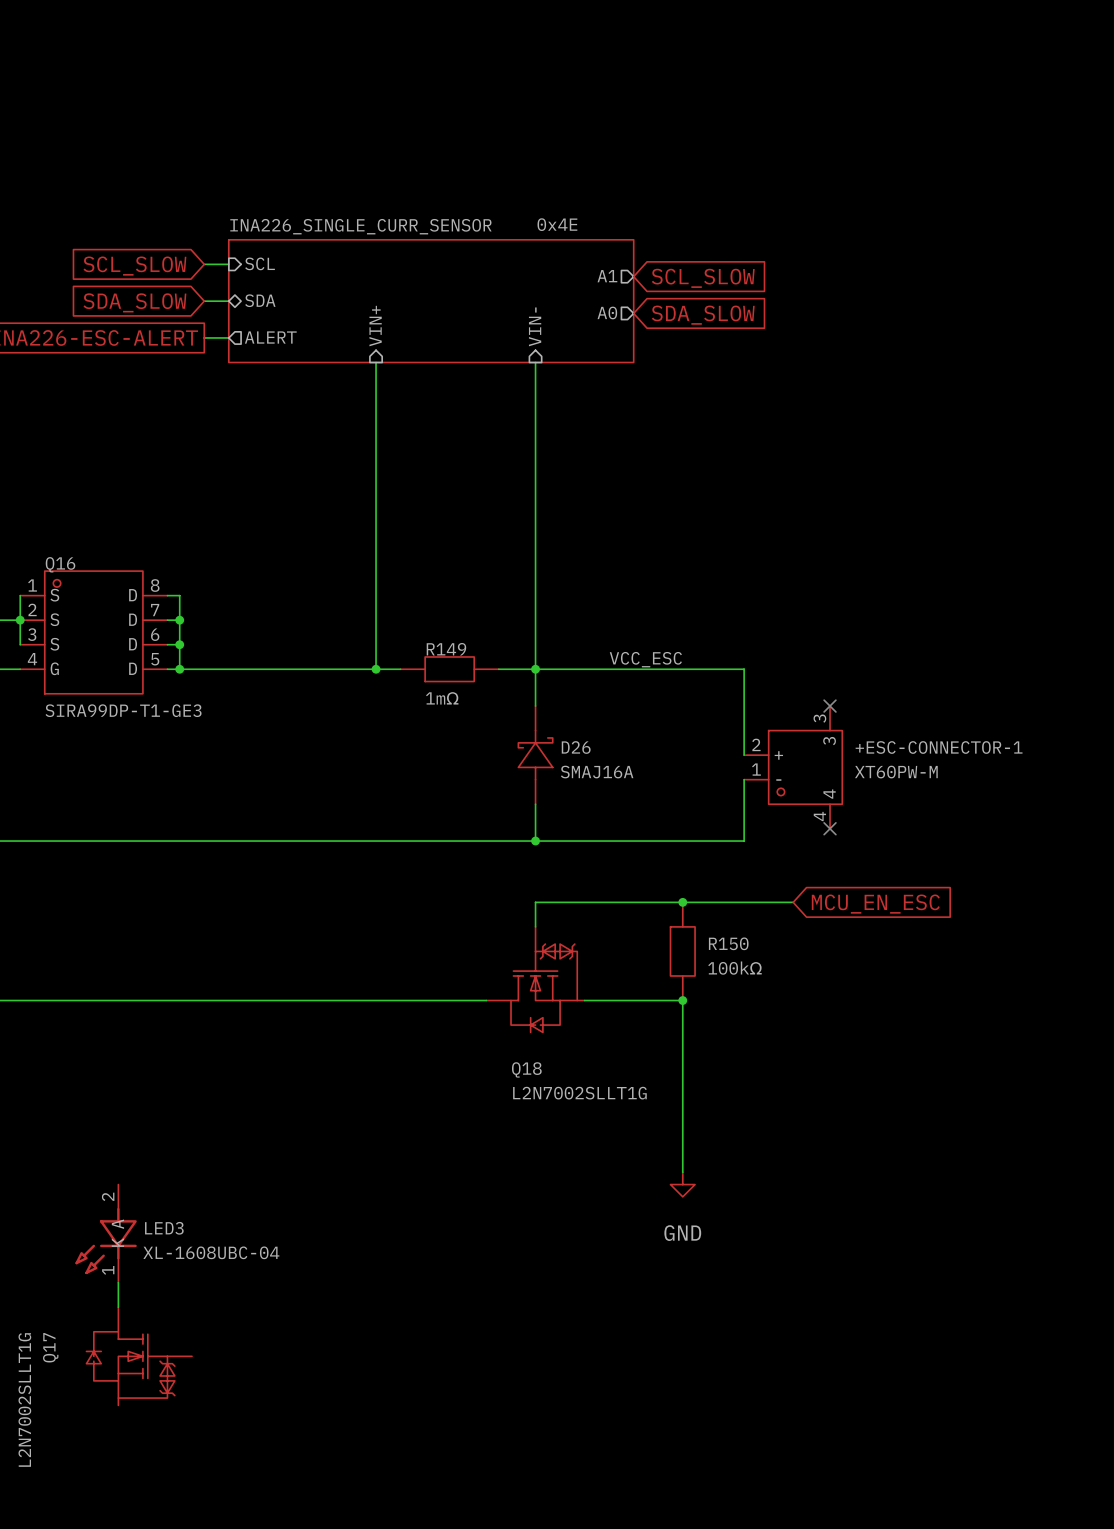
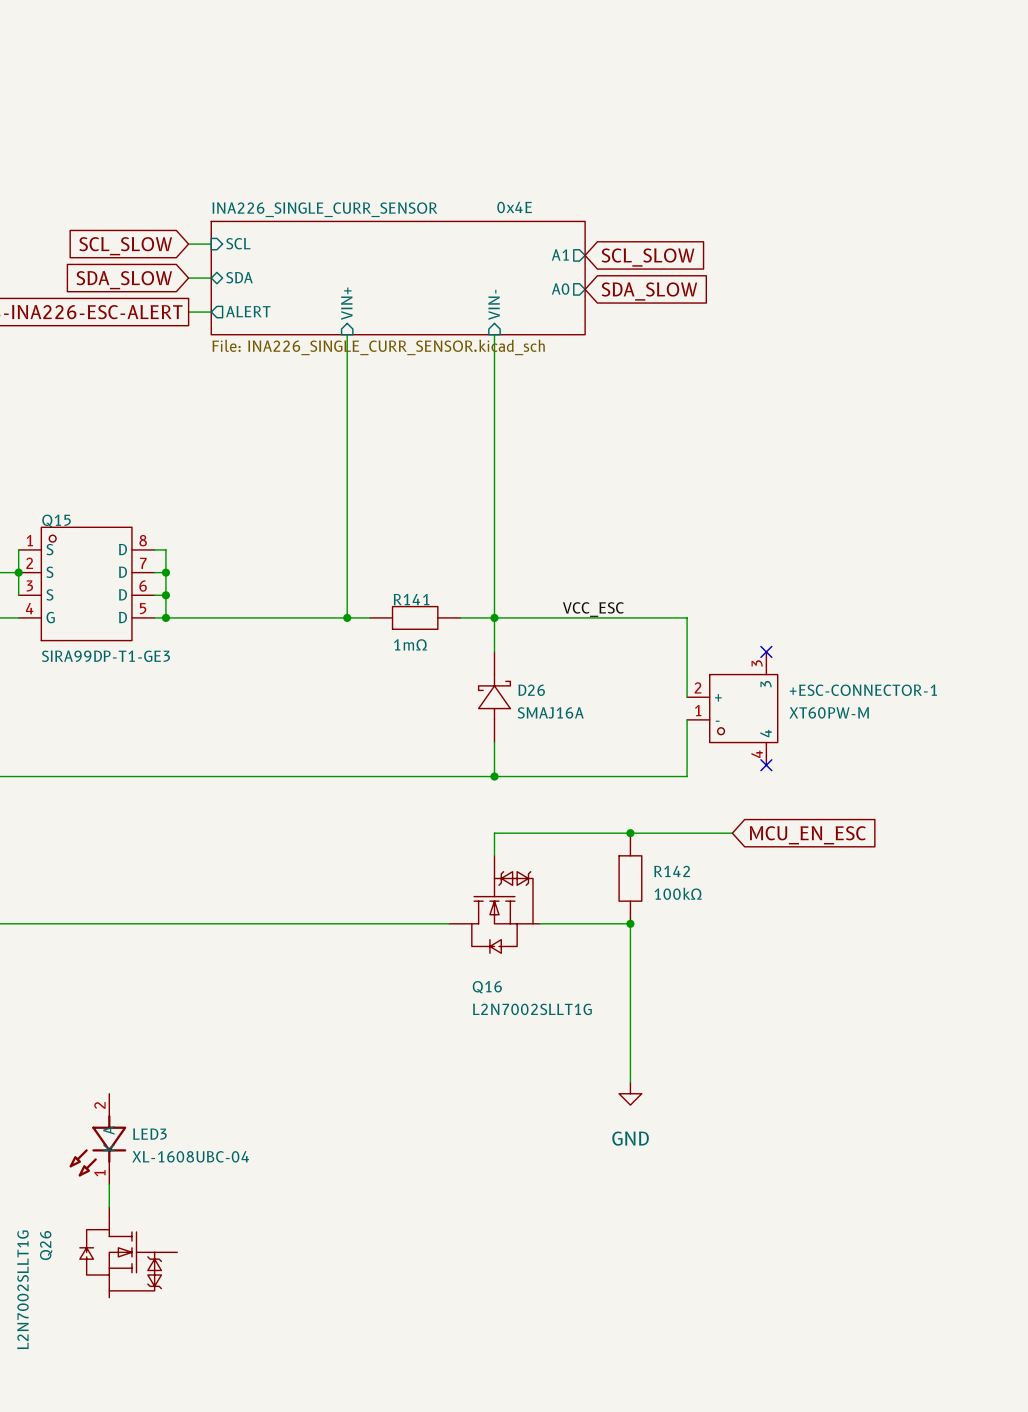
sheet INA226_SINGLE_CURR_SENSOR value: none -> File: INA226_SINGLE_CURR_SENSOR.kicad_sch (378, 347)
Q16 name: Q16 (60, 564) -> Q15 (56, 520)
R149 name: R149 (446, 649) -> R141 (411, 599)
R150 name: R150 (728, 943) -> R142 (672, 871)
Q18 name: Q18 (526, 1069) -> Q16 (487, 987)
Q17 name: Q17 (50, 1347) -> Q26 (46, 1245)

